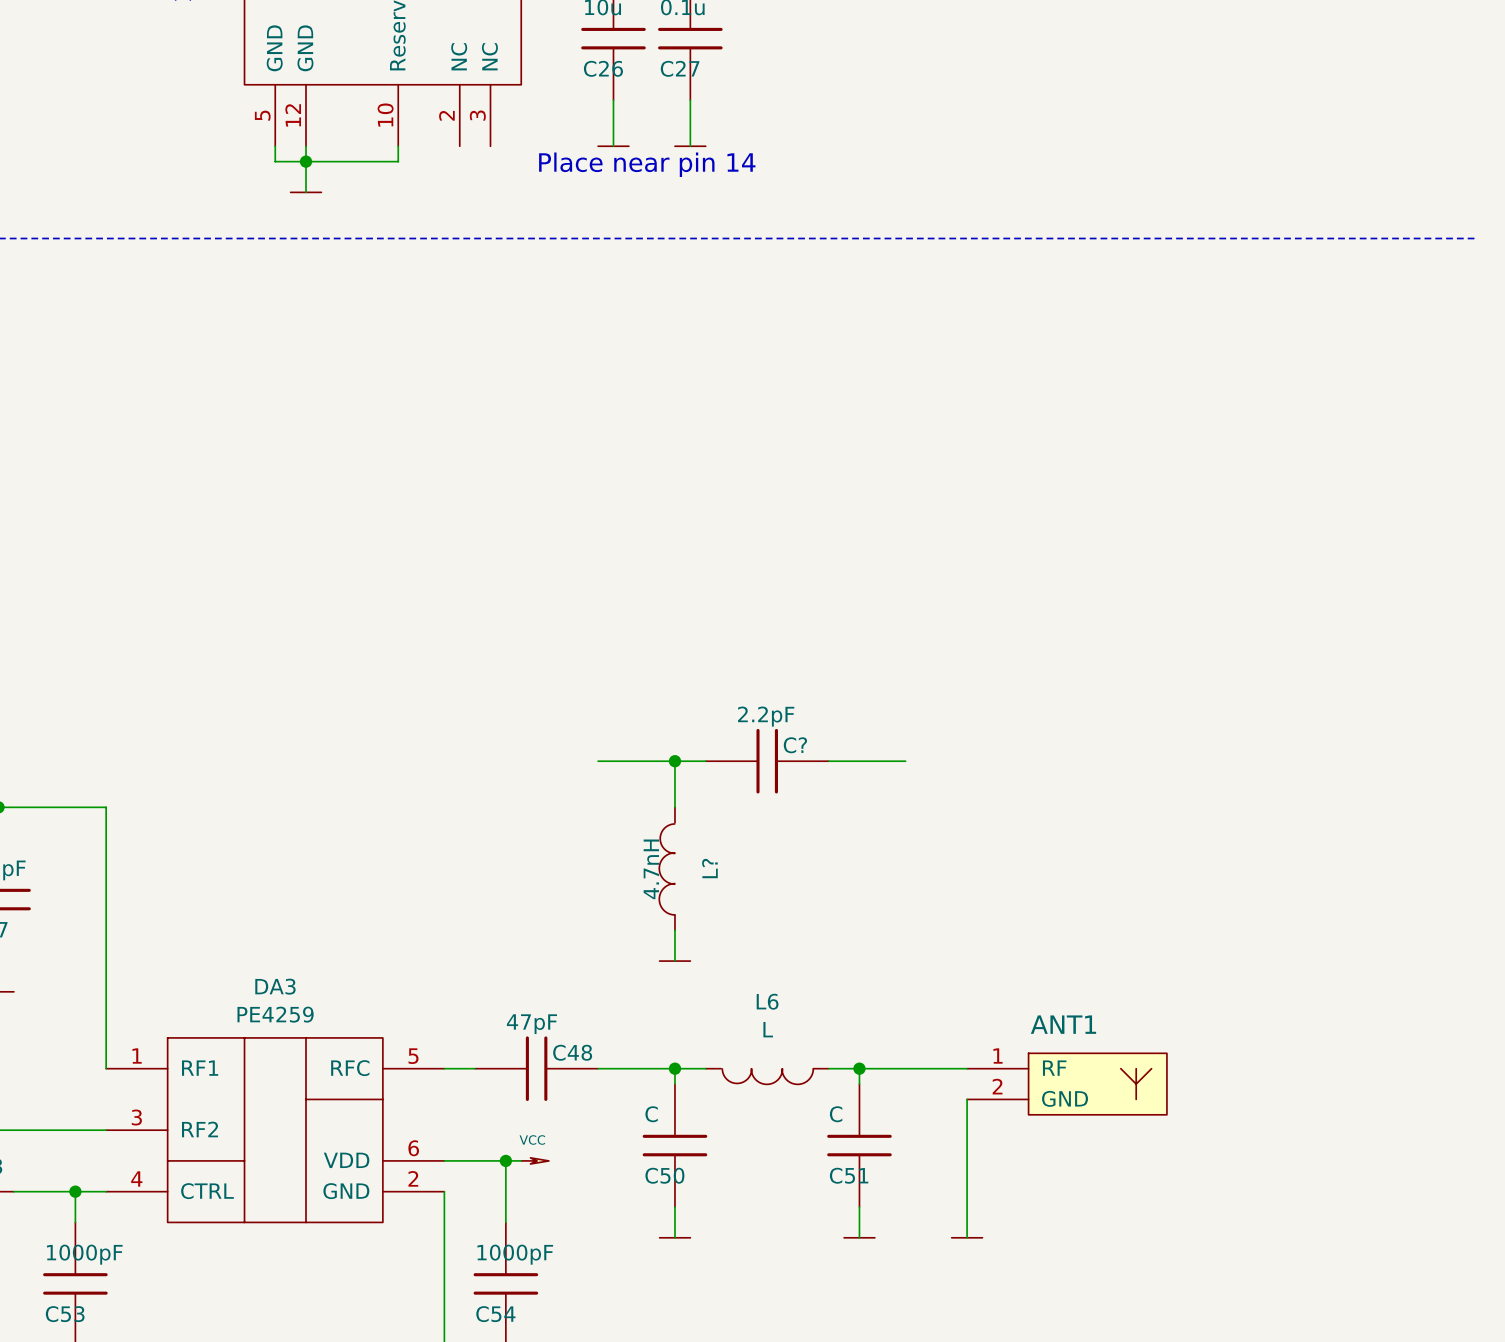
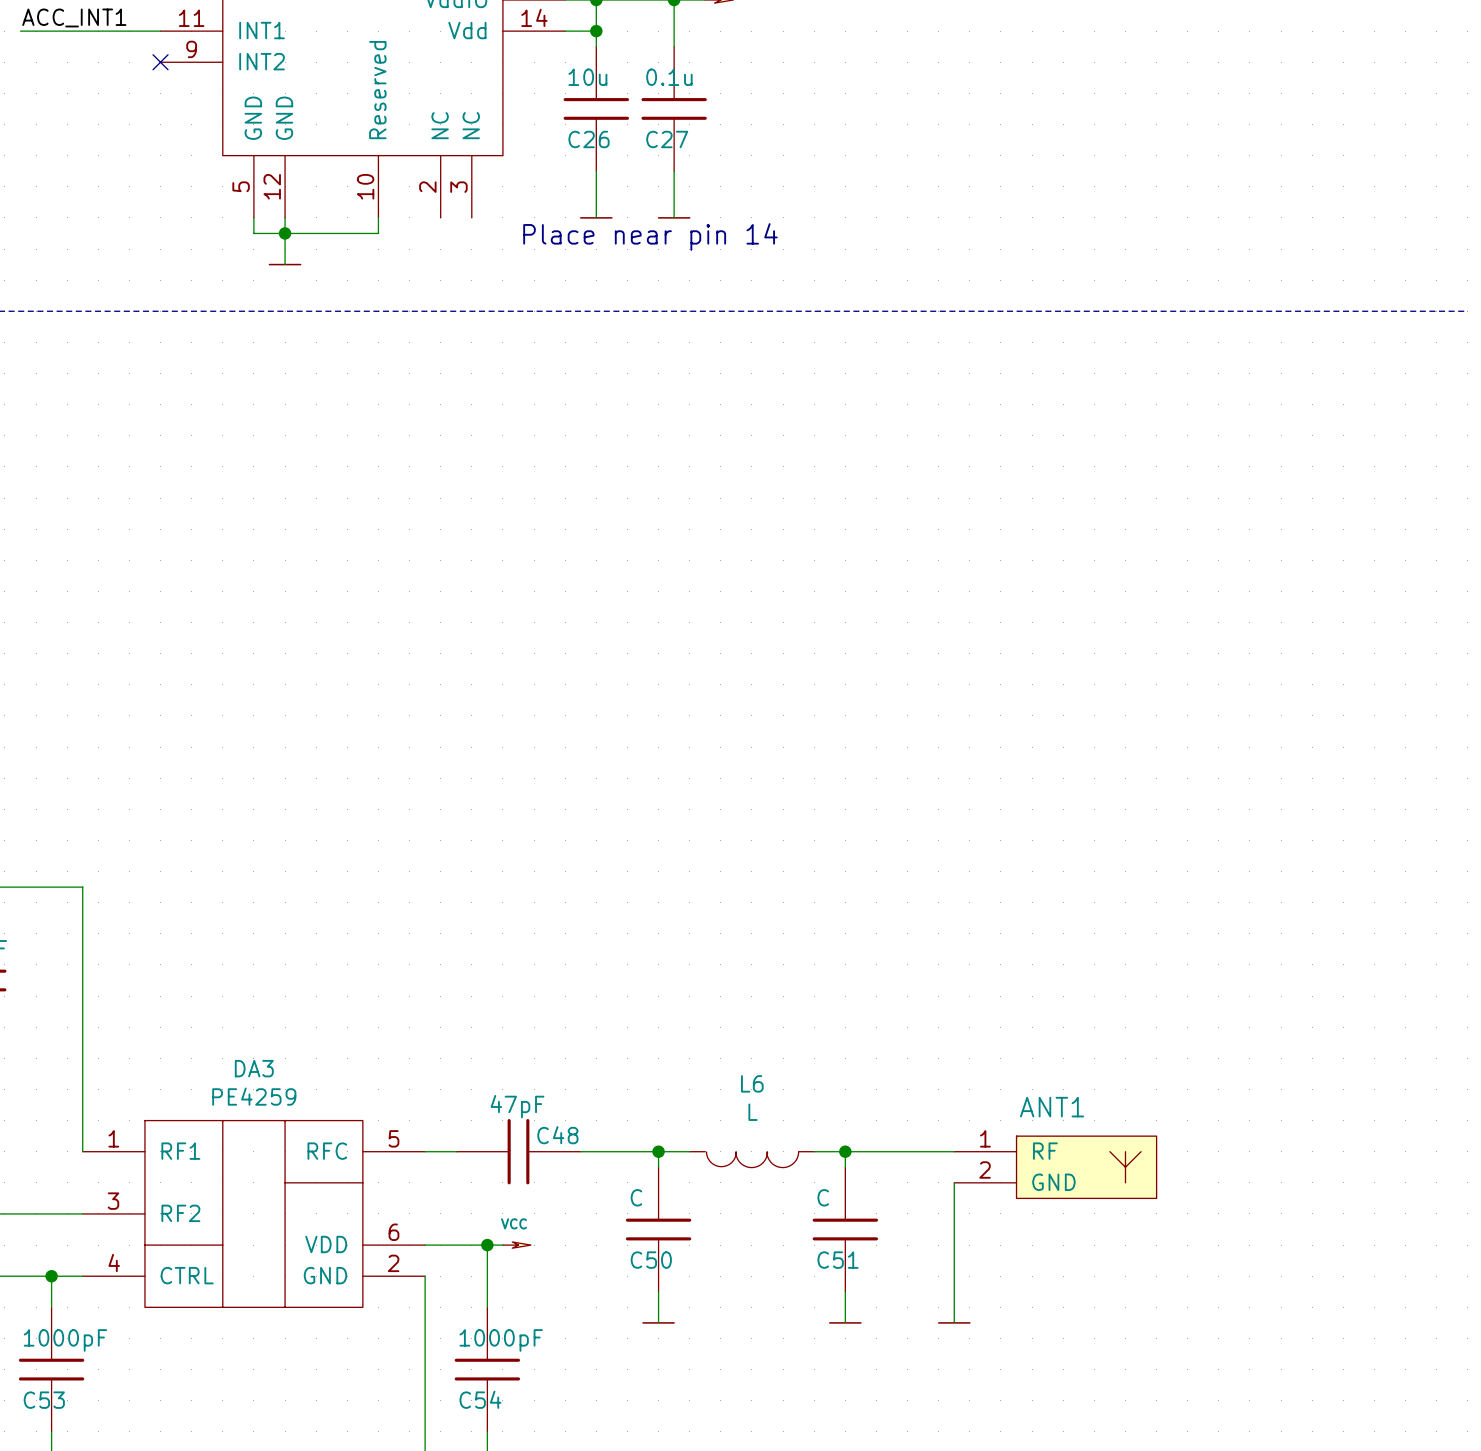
wire: (598, 761) (705, 761) -> none
wire: (674, 761) (674, 807) -> none
junction: (674, 761) -> none
C?: 2.2pF (767, 761) -> none
wire: (828, 761) (905, 761) -> none
L?: 4.7nH (667, 868) -> none
wire: (674, 930) (674, 961) -> none
power symbol: (674, 961) -> none

